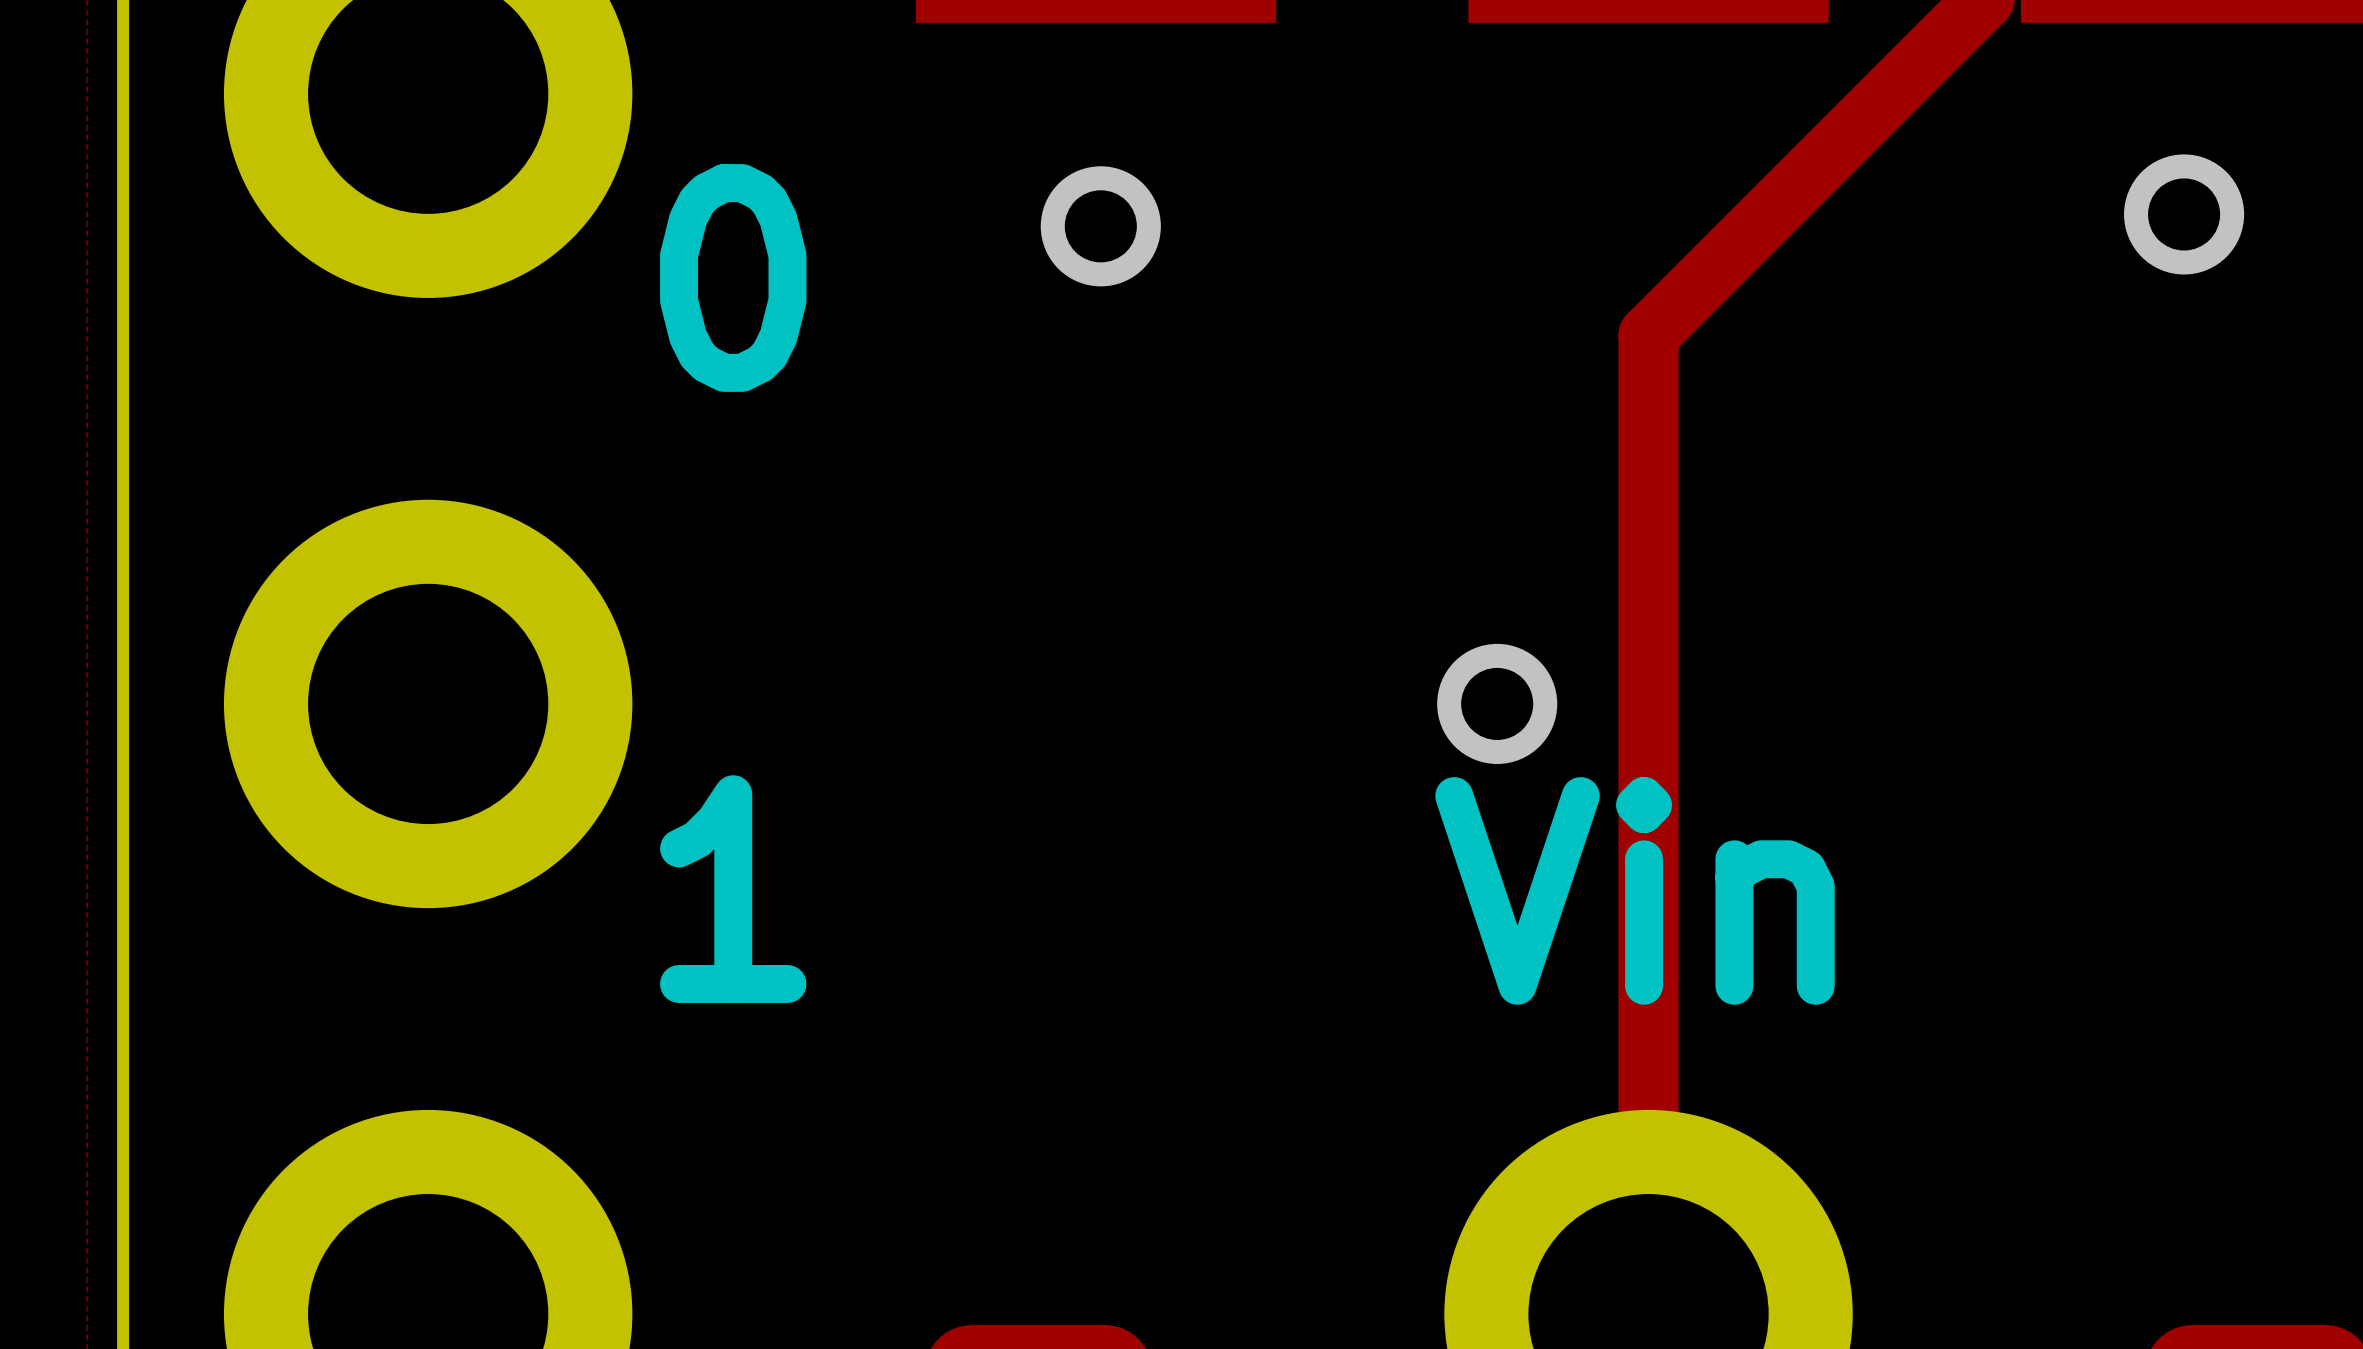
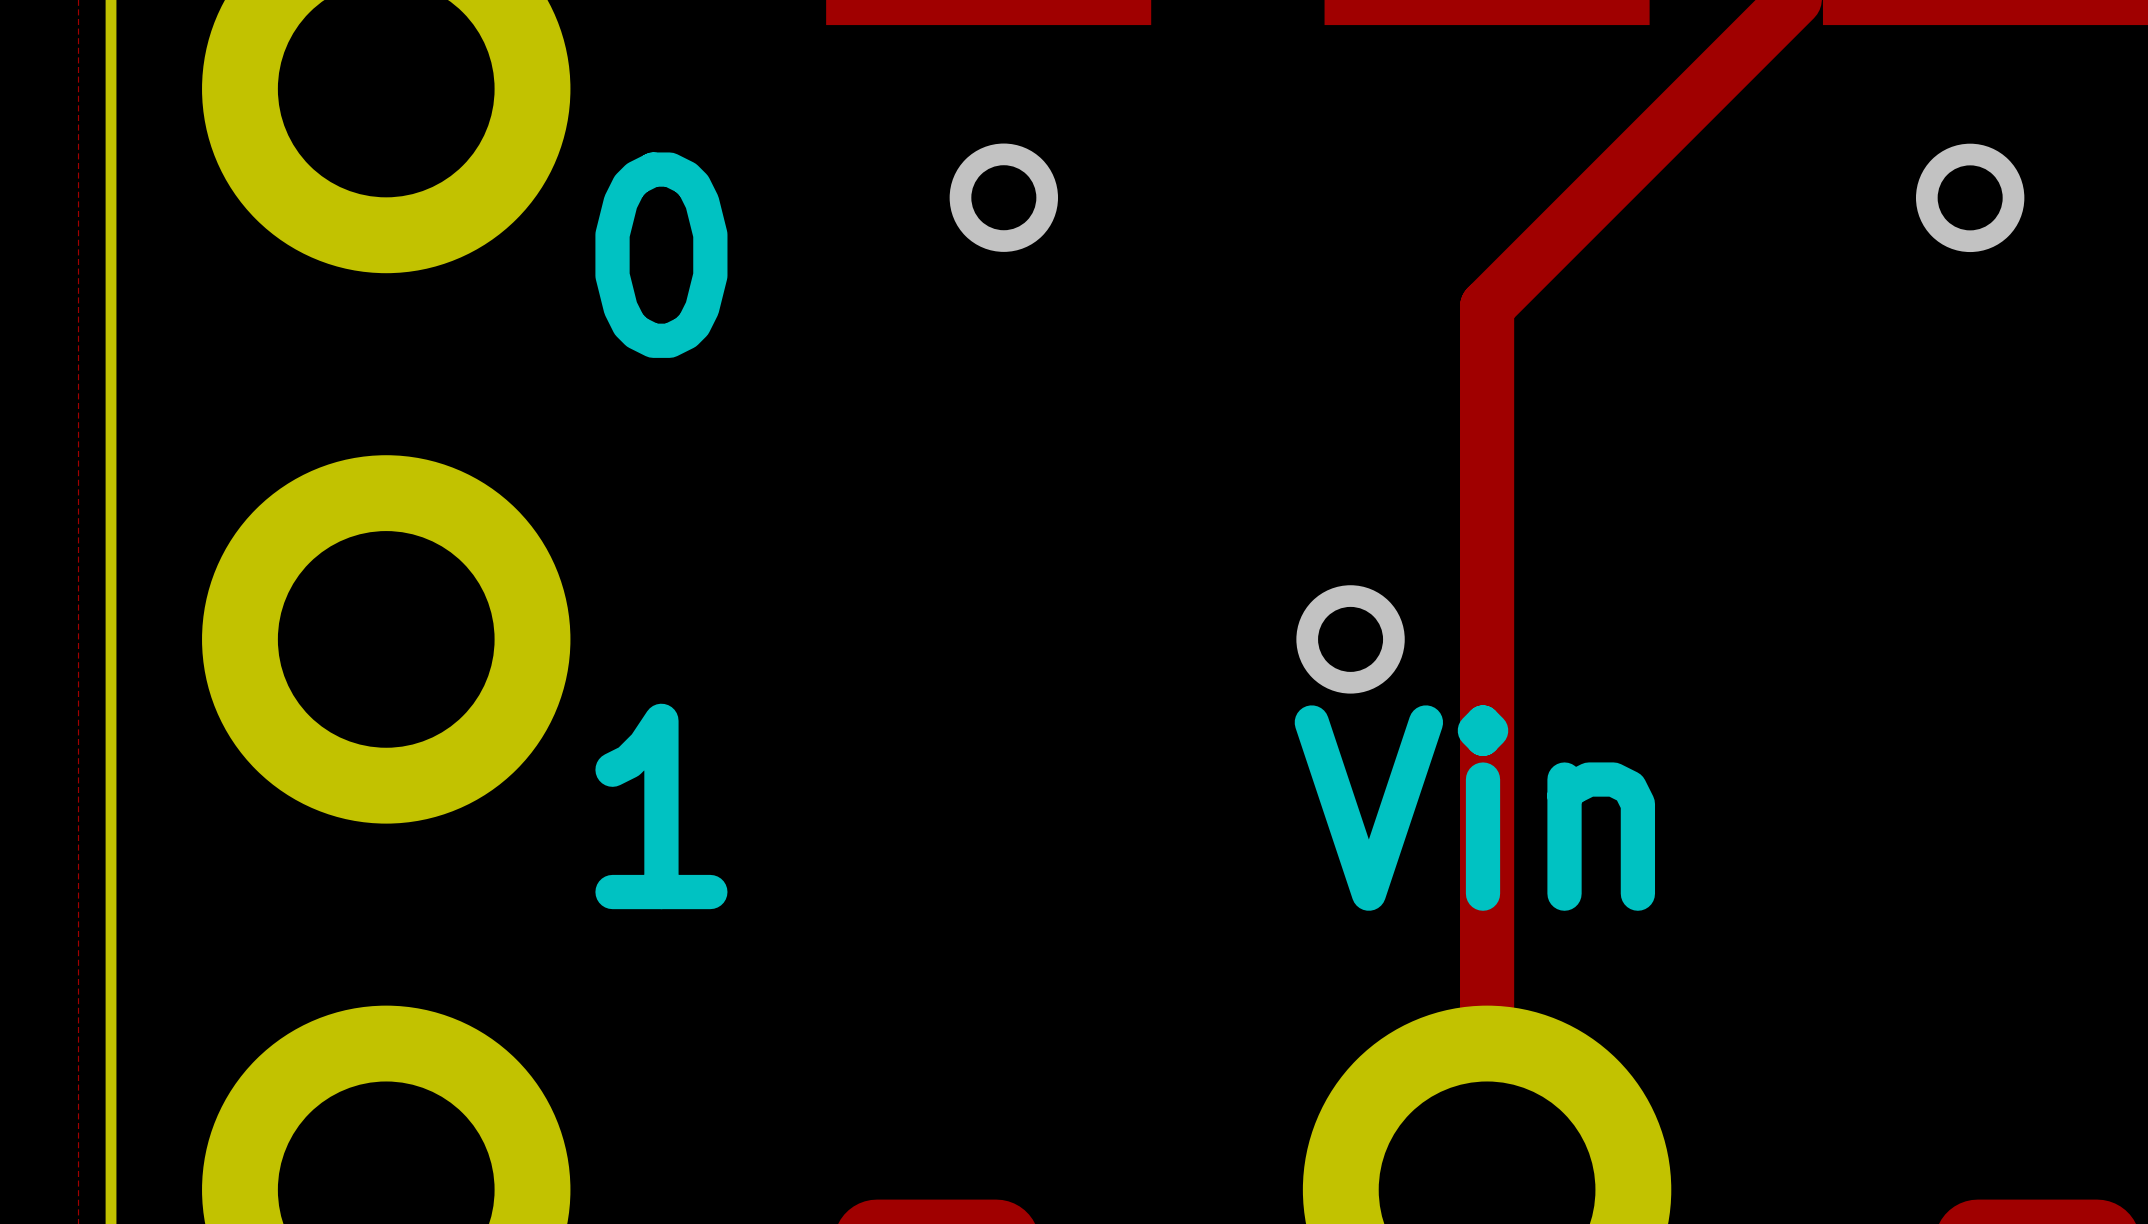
via position: (1100, 226) -> (1003, 197)

